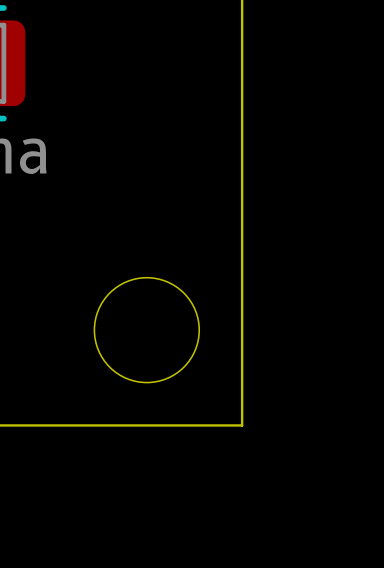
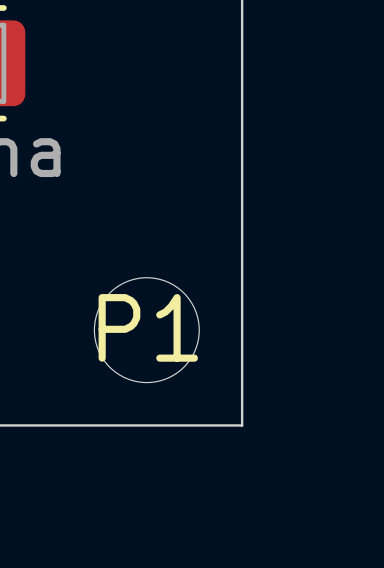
P1 name: none -> P1 (148, 327)

